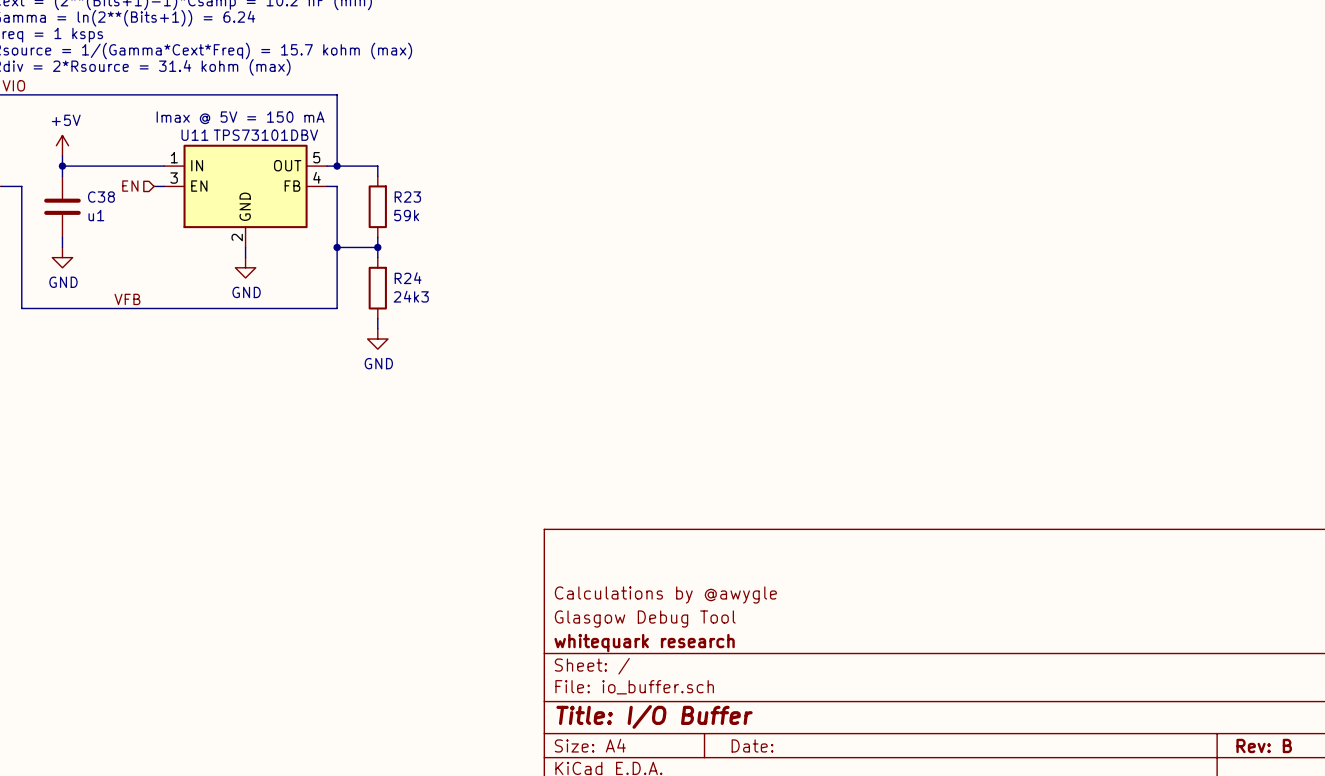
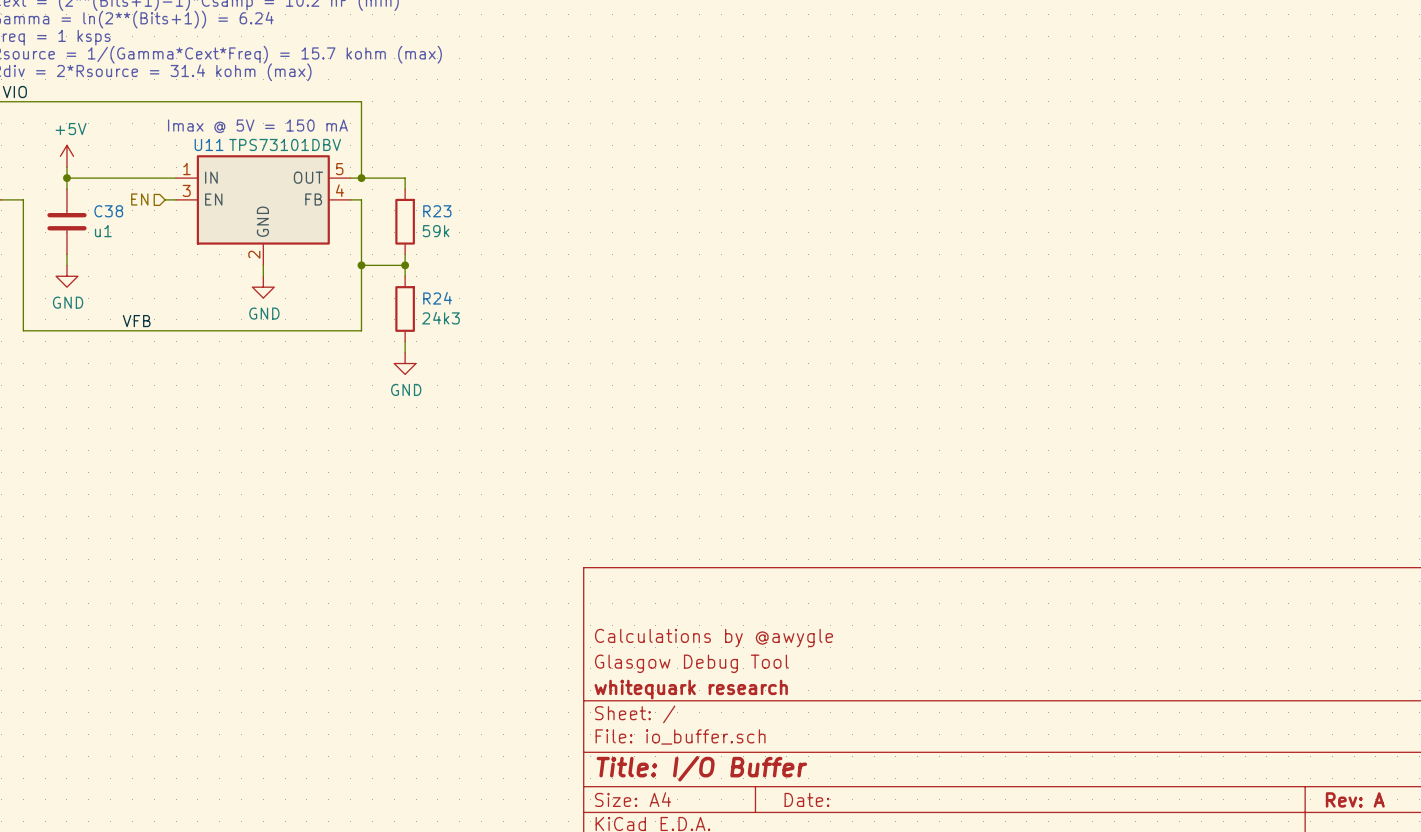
title block: Rev: B (1264, 745) -> Rev: A (1355, 799)

